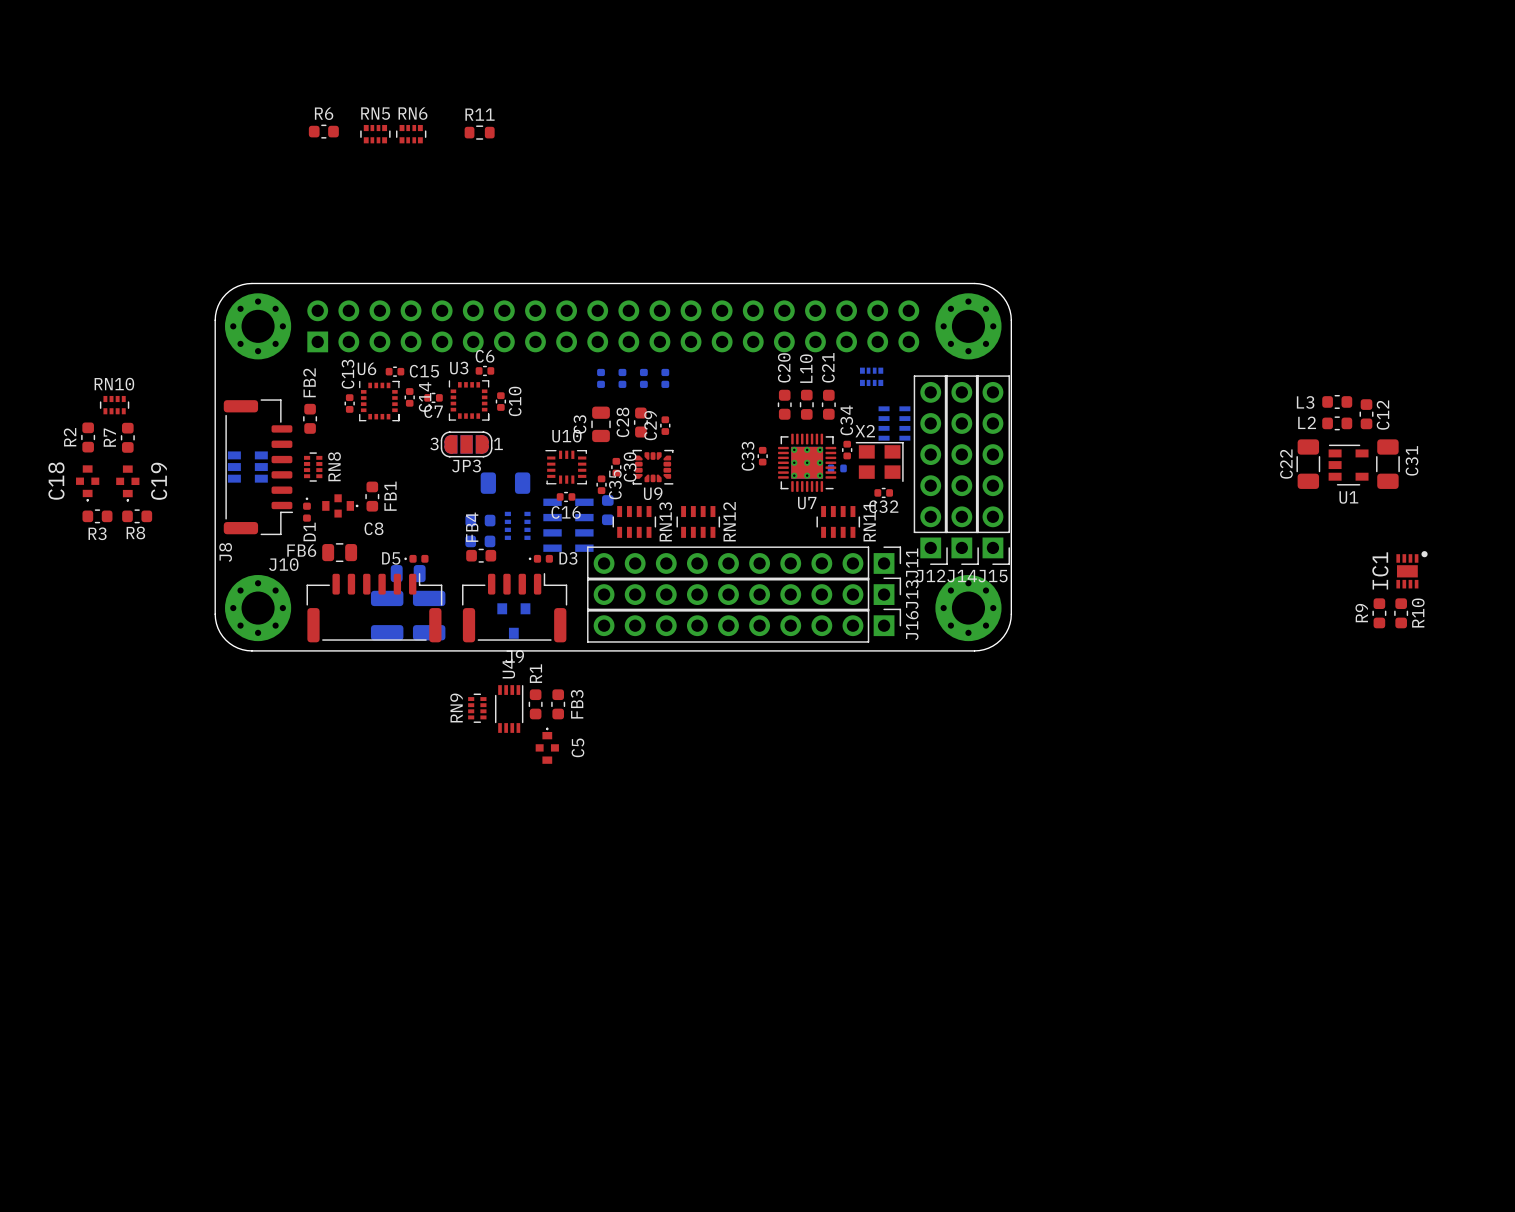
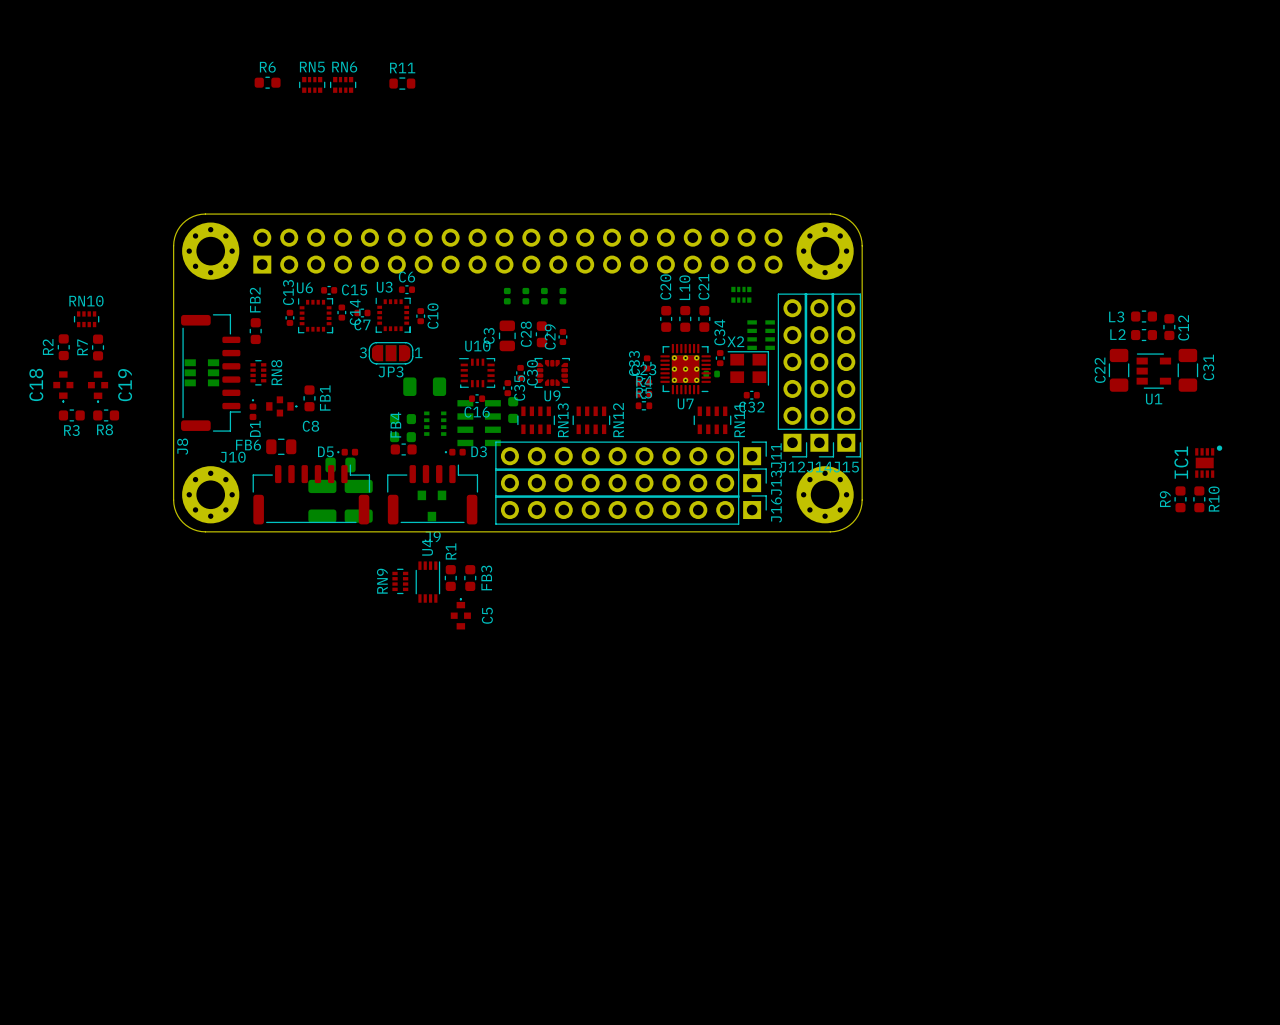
C23: none -> (643, 382)
R4: none -> (643, 394)
R5: none -> (643, 405)

